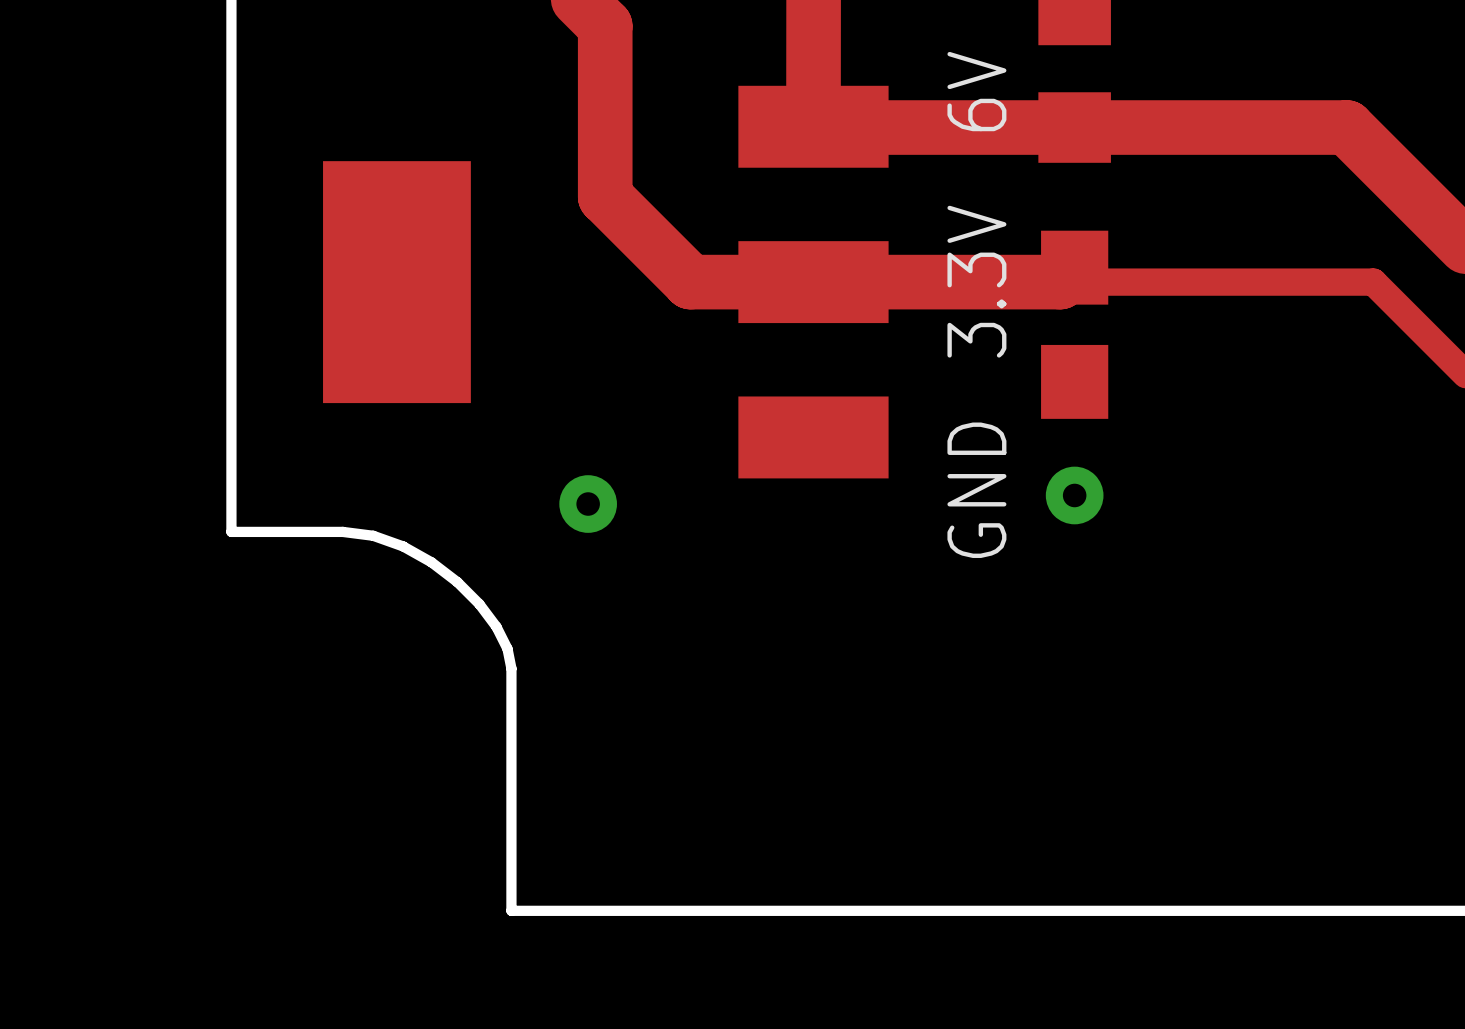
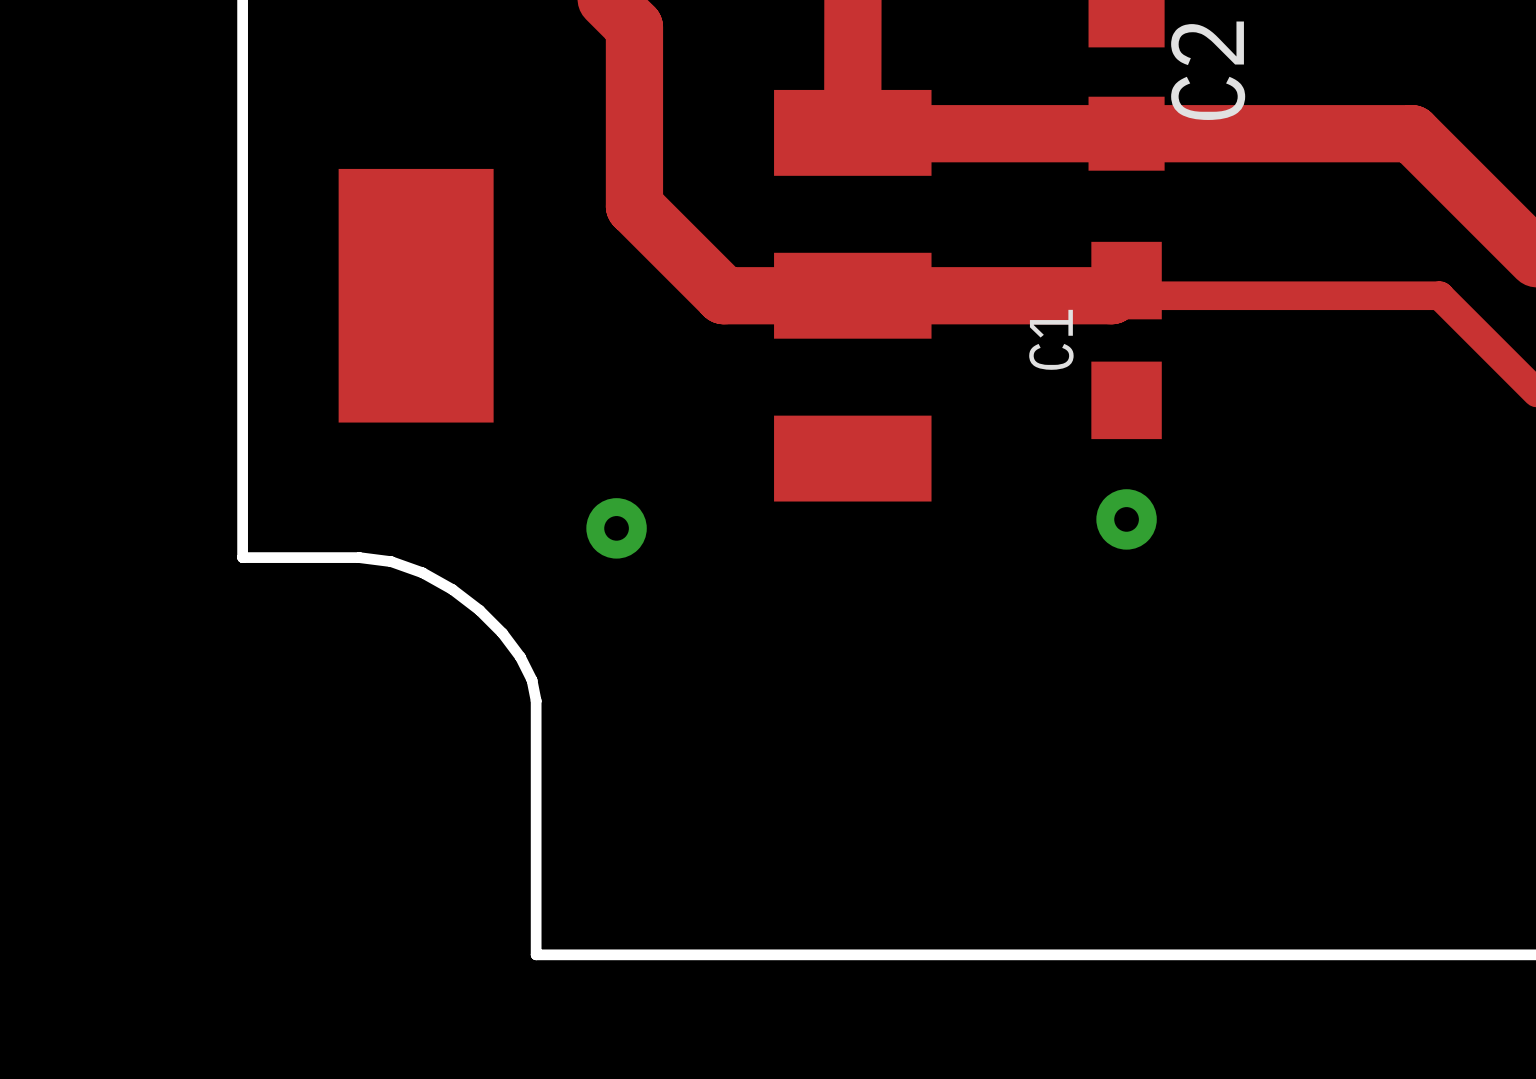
C2 name: none -> C2 (1208, 70)
text: 6V (976, 91) -> none
text: 3.3V (976, 281) -> none
C1 name: none -> C1 (1051, 339)
text: GND (976, 490) -> none

